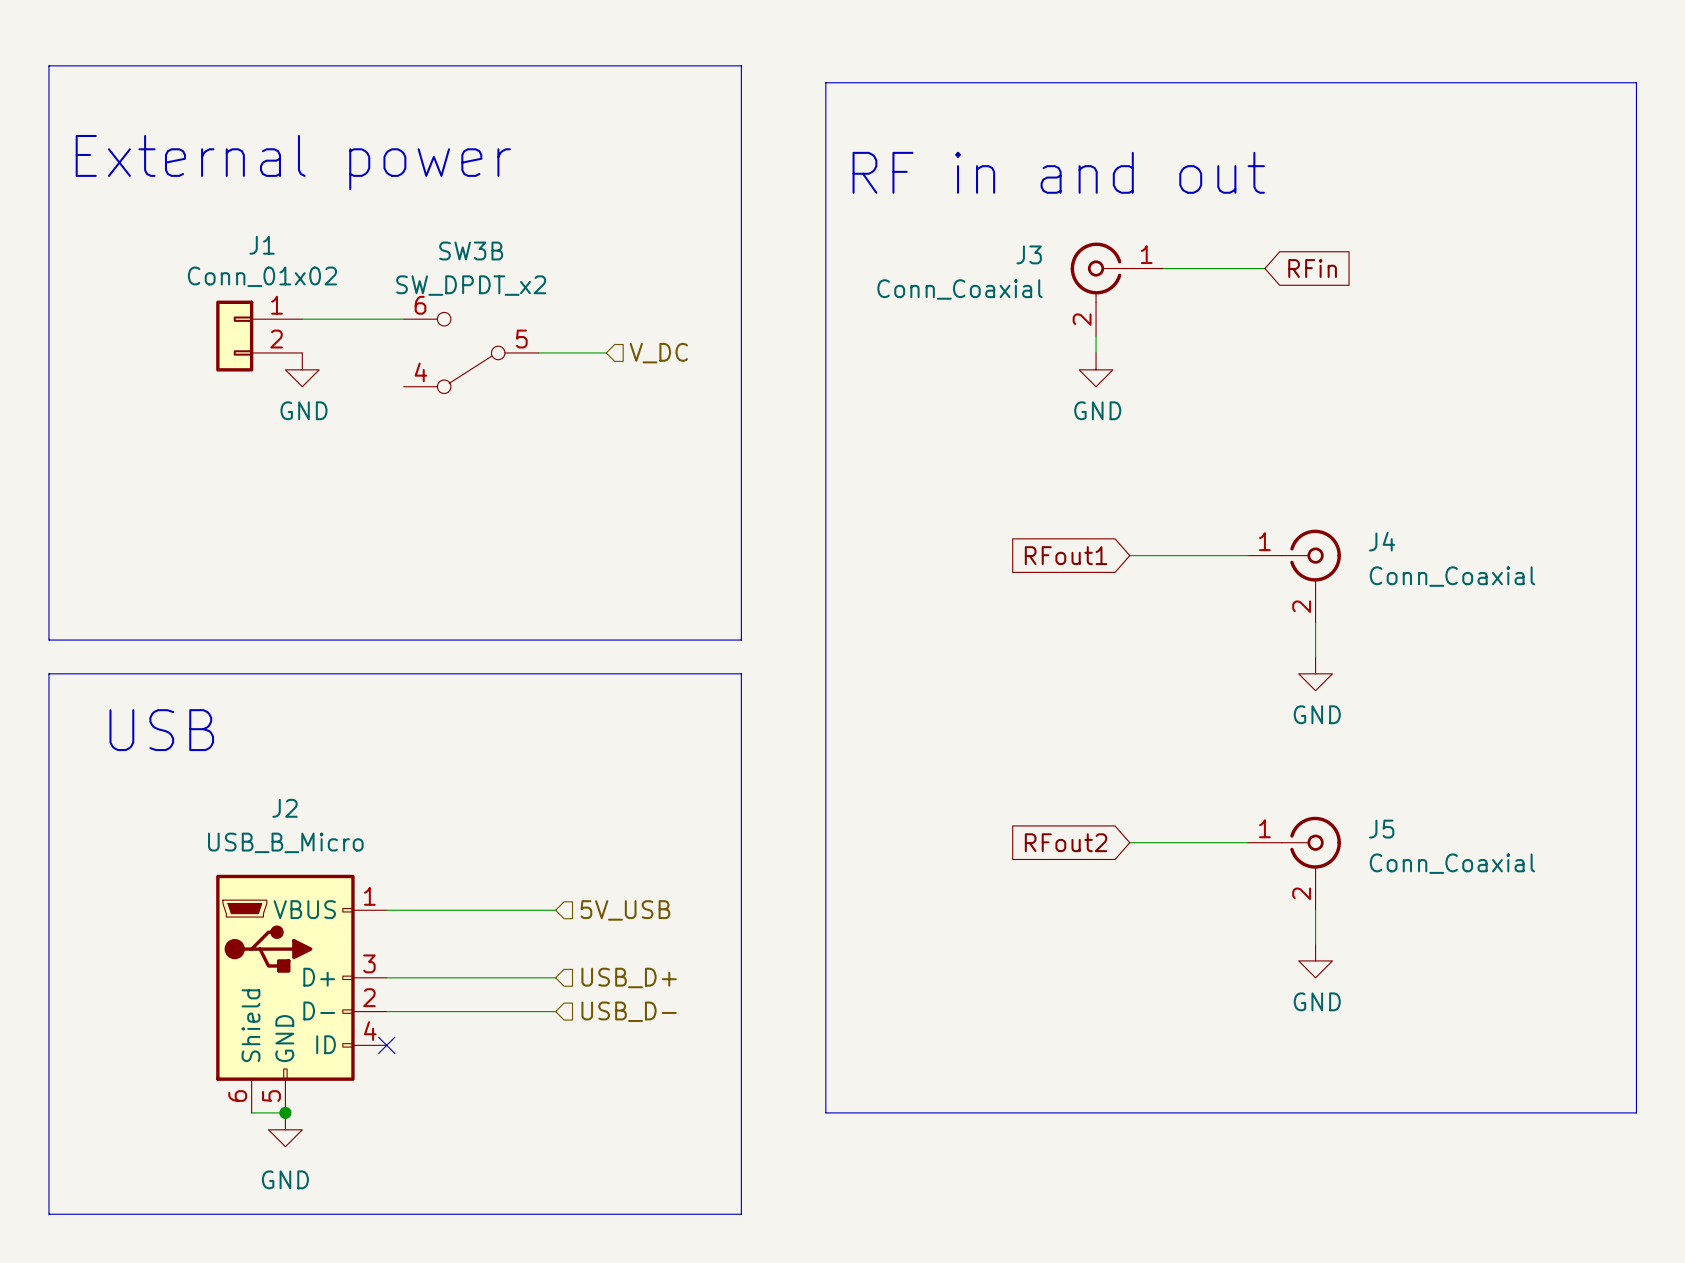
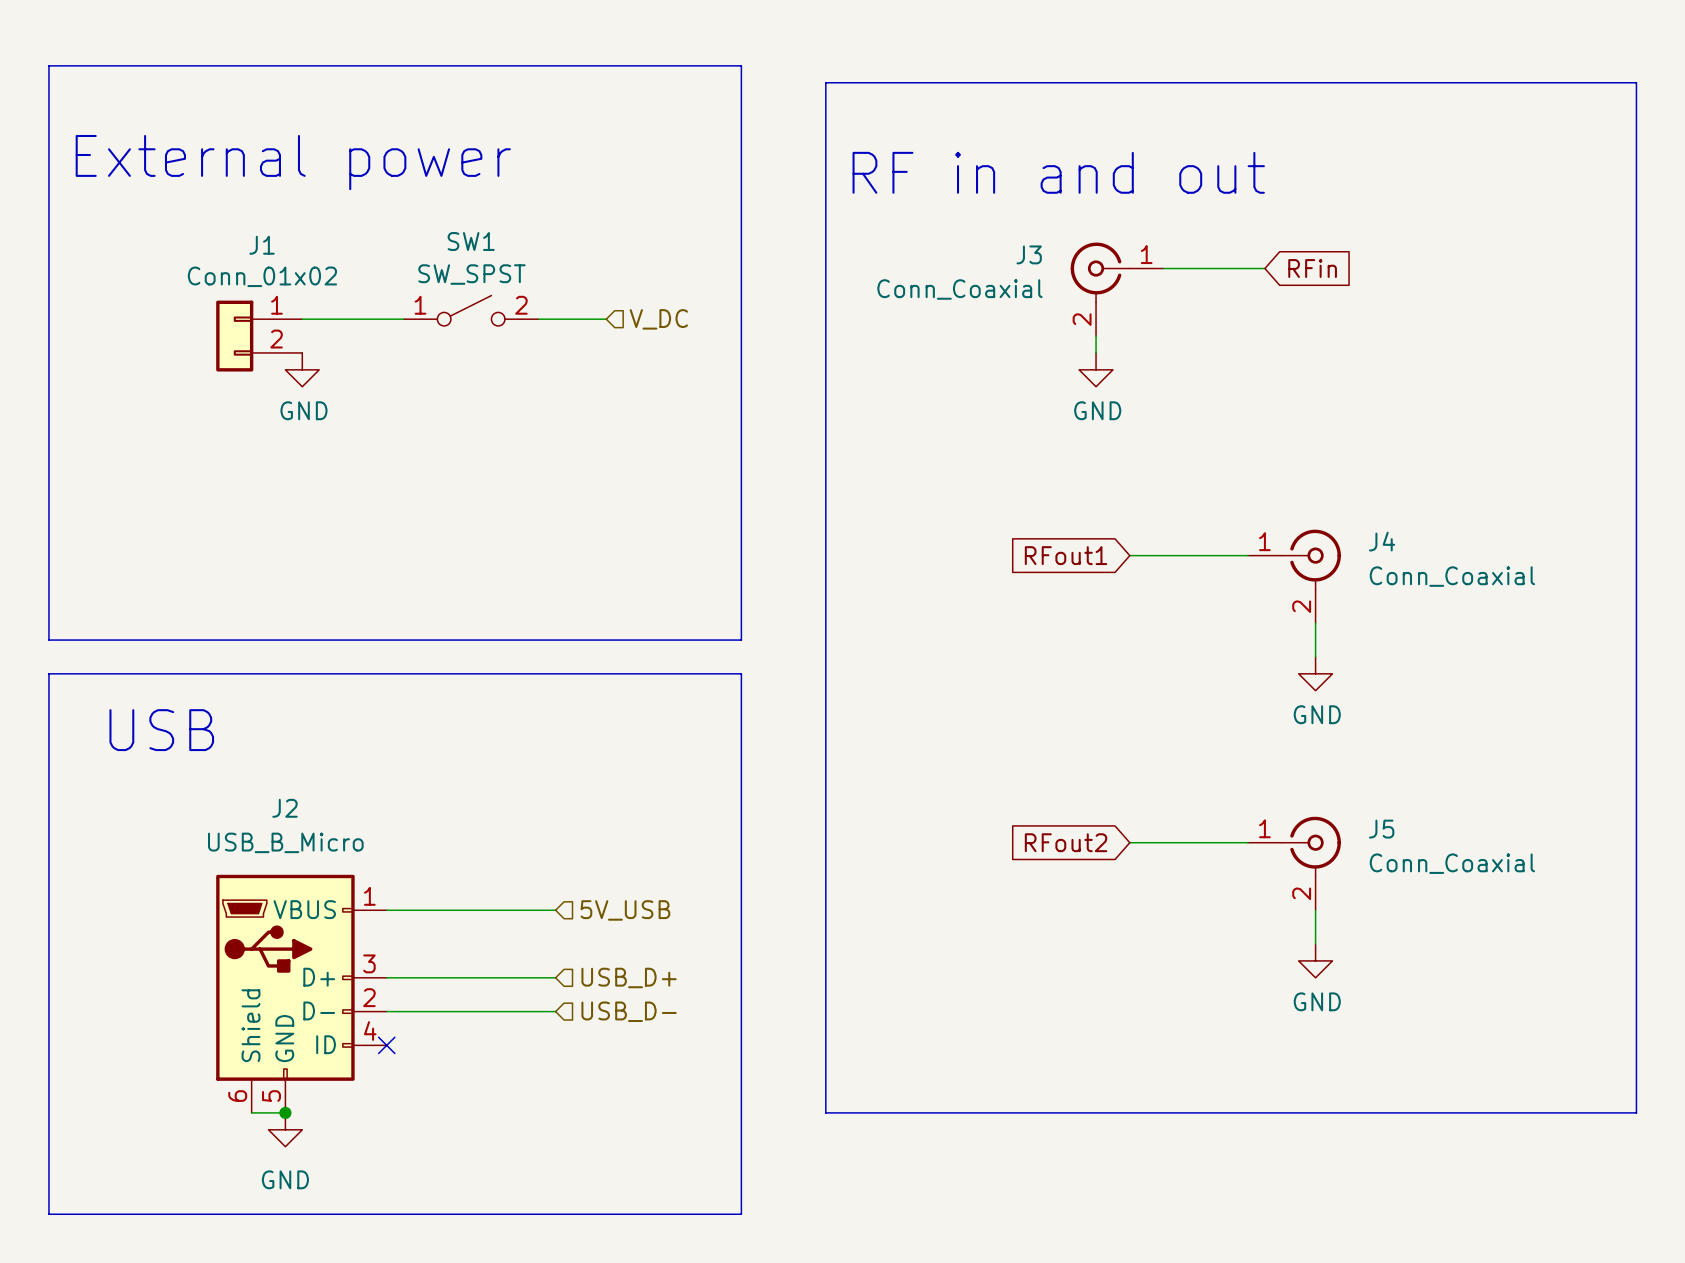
SW1: none -> SW_SPST (471, 310)
SW3B: SW_DPDT_x2 (471, 352) -> none
wire: (538, 352) (606, 352) -> (538, 319) (606, 319)
hierarchical label position: V_DC (658, 353) -> V_DC (658, 319)

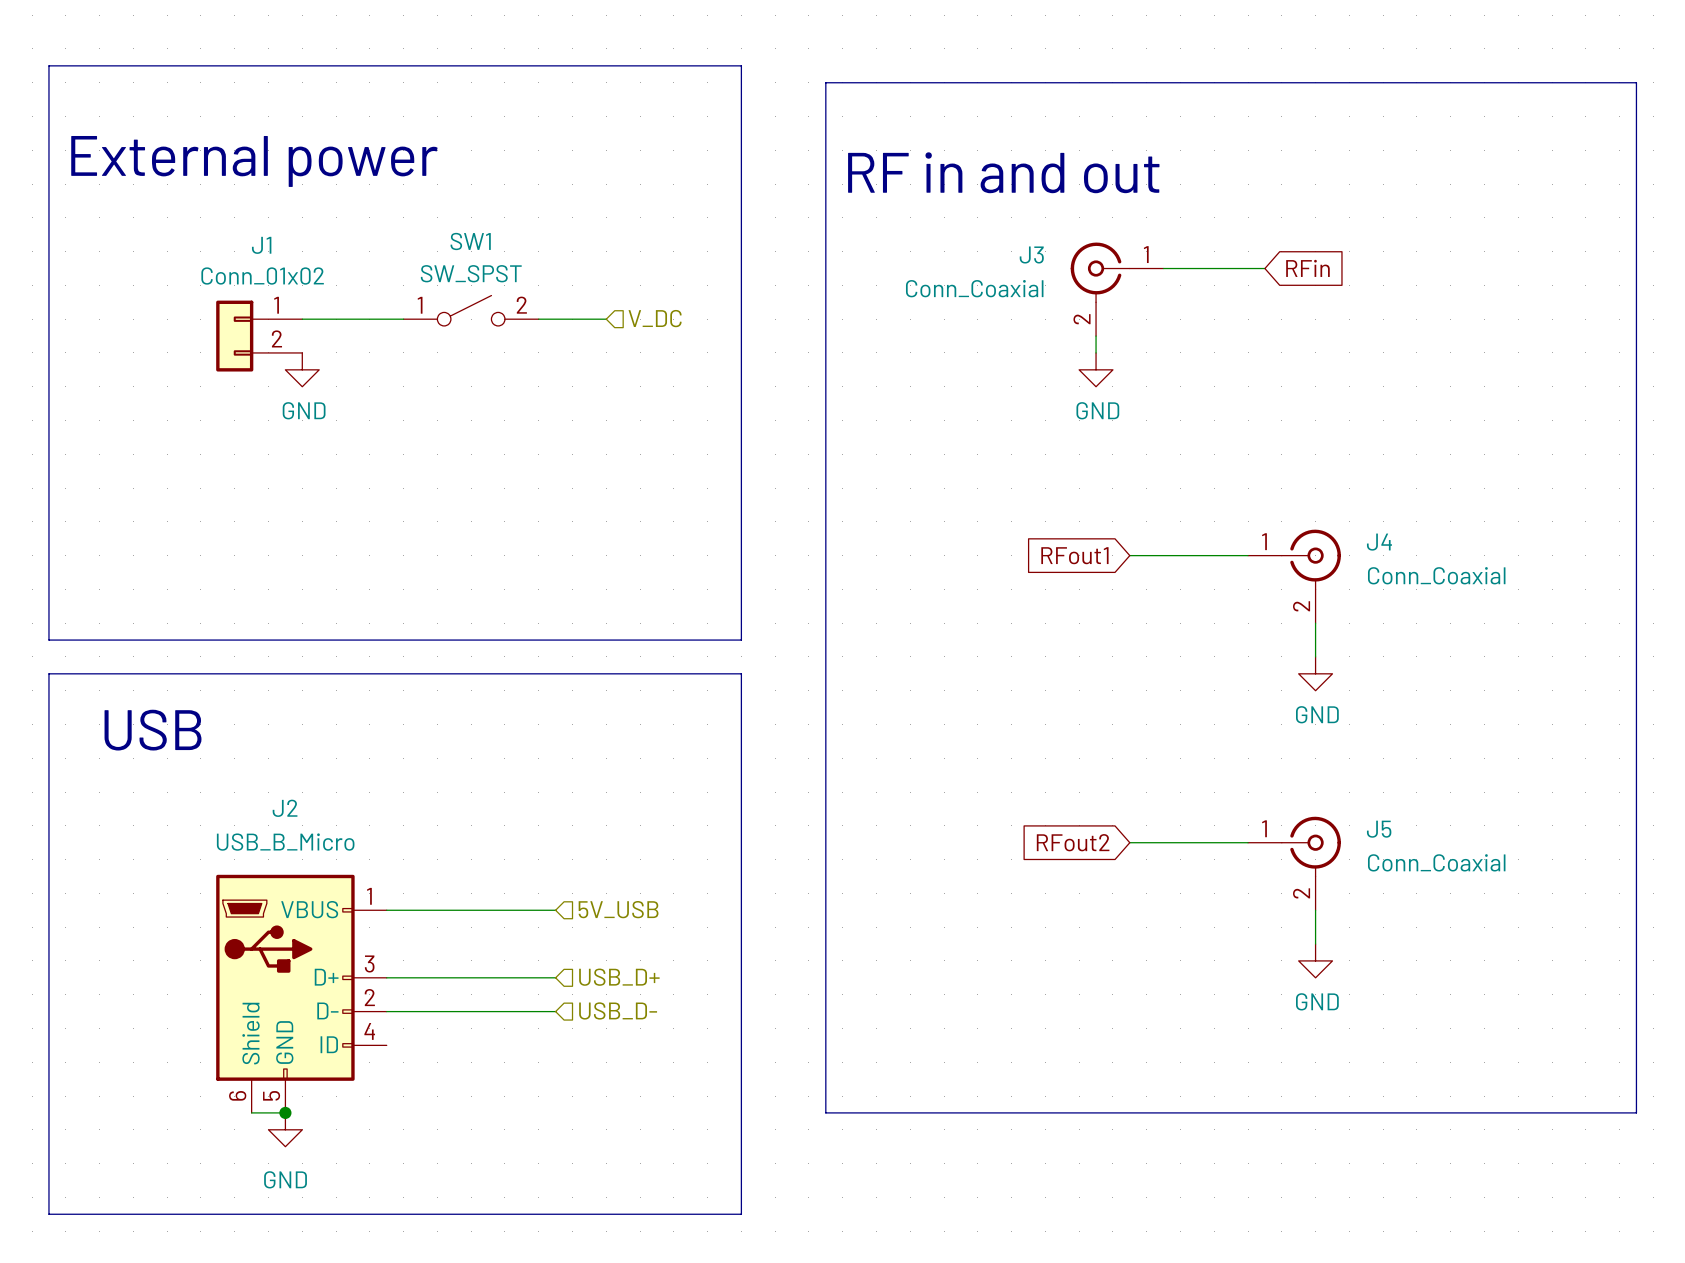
no-connect mark: (386, 1045) -> none

